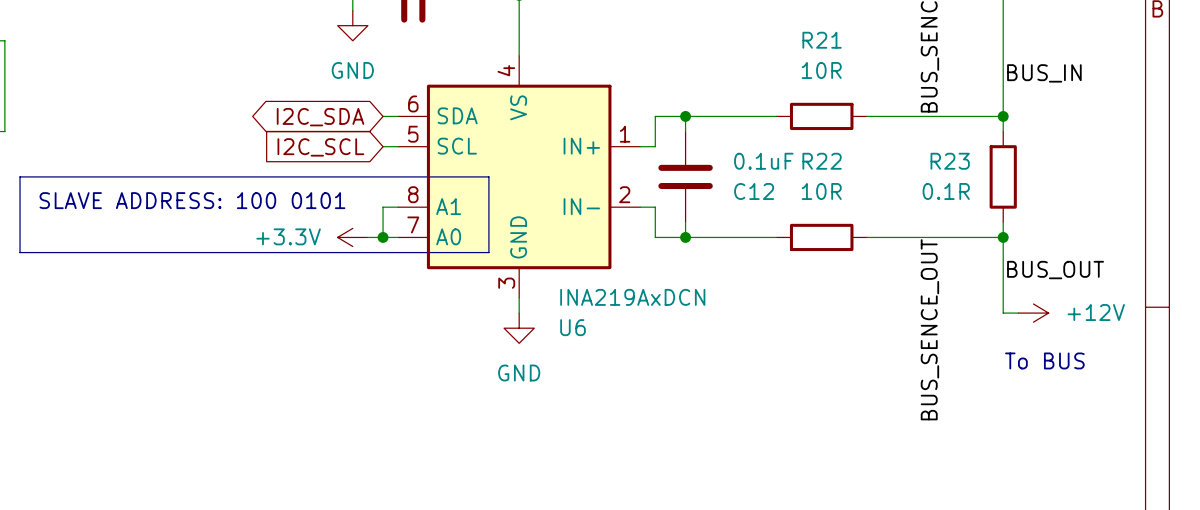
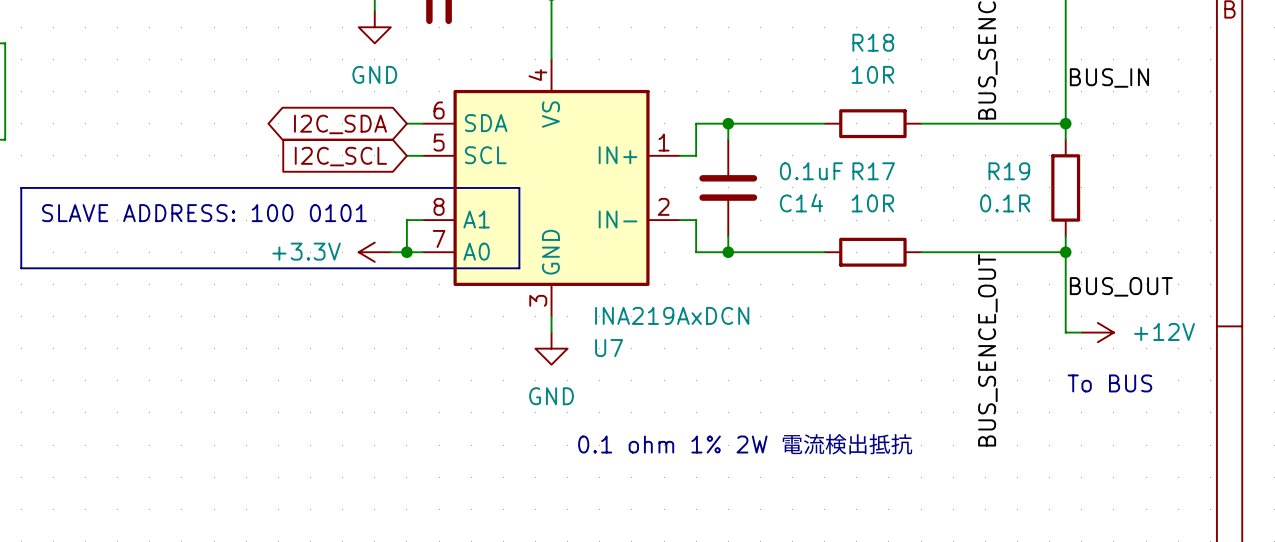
R21 name: R21 (822, 40) -> R18 (873, 42)
R22 name: R22 (822, 161) -> R17 (873, 171)
R23 name: R23 (950, 161) -> R19 (1009, 171)
C12 name: C12 (754, 191) -> C14 (801, 203)
U6 name: U6 (573, 327) -> U7 (609, 348)
text: none -> 0.1 ohm 1% 2W 電流検出抵抗 (745, 444)

